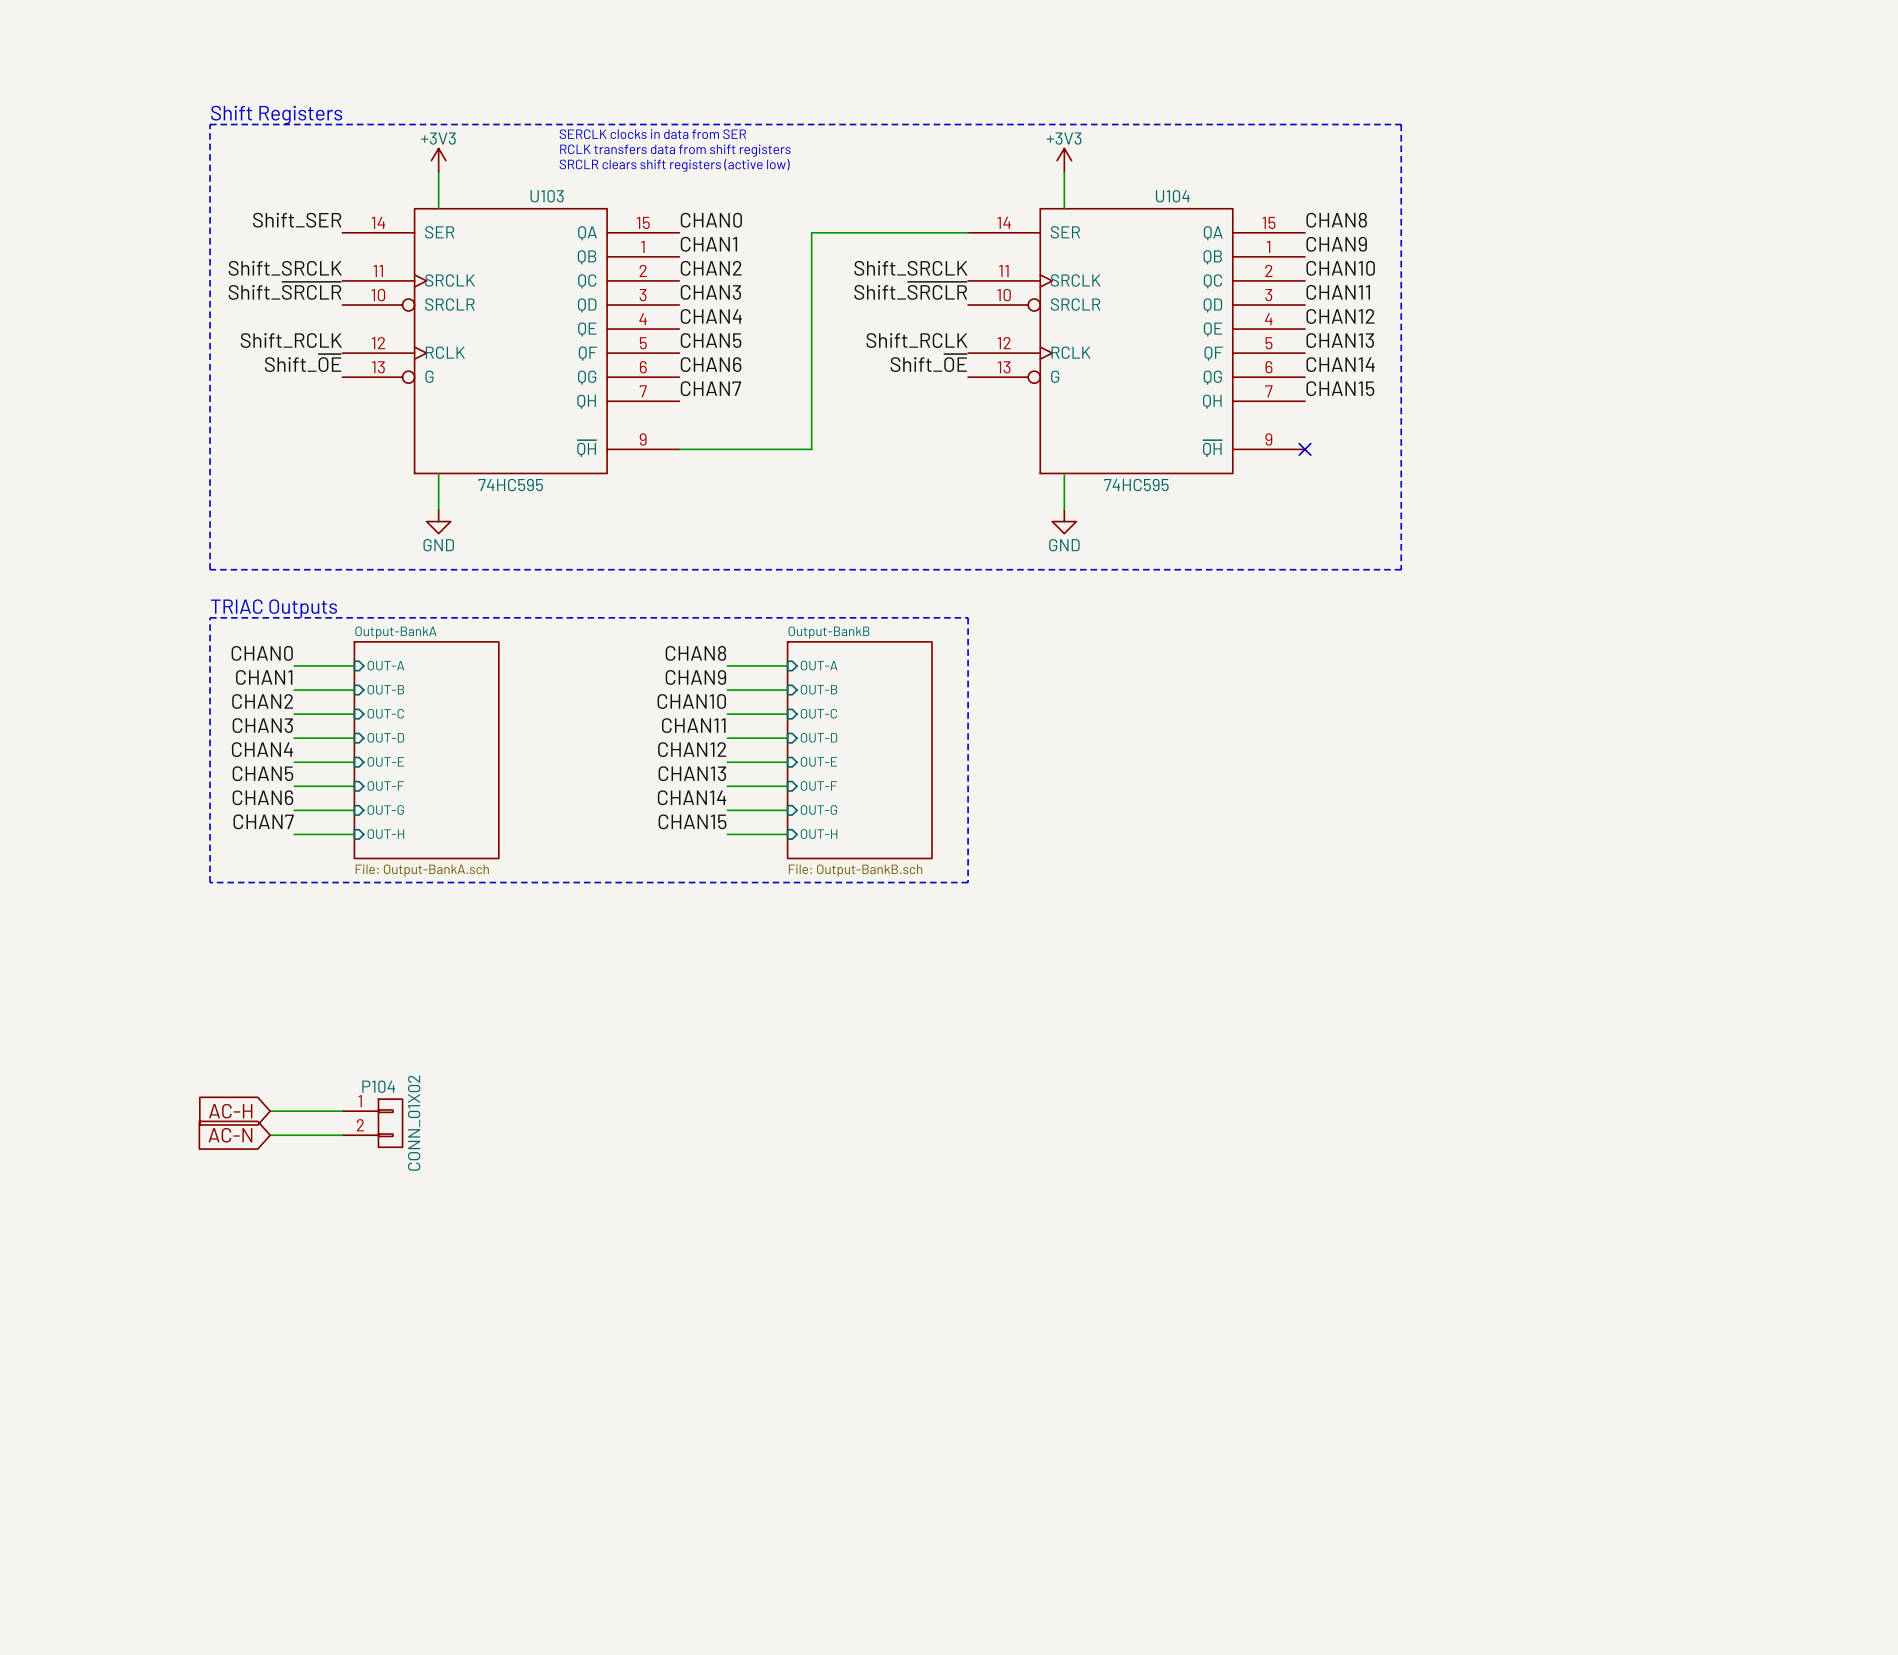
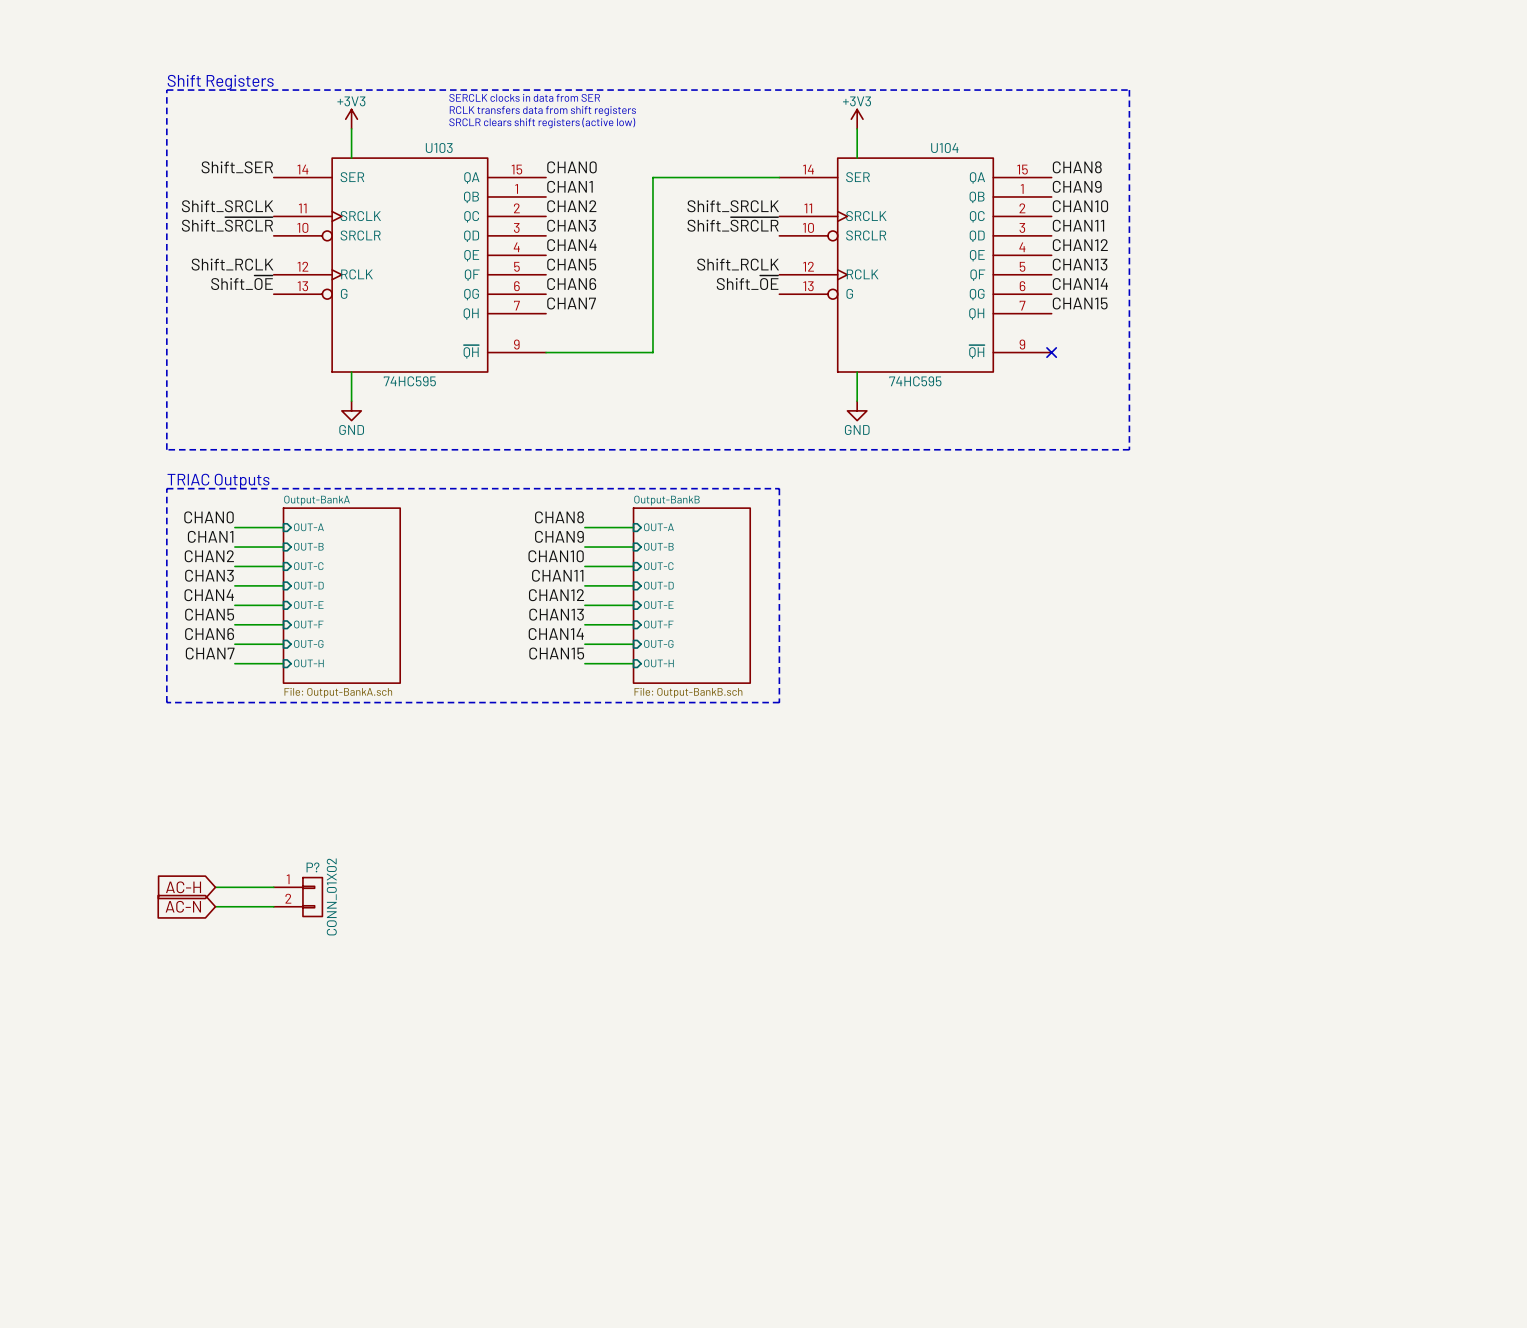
P104 name: P104 (378, 1086) -> P? (312, 867)

